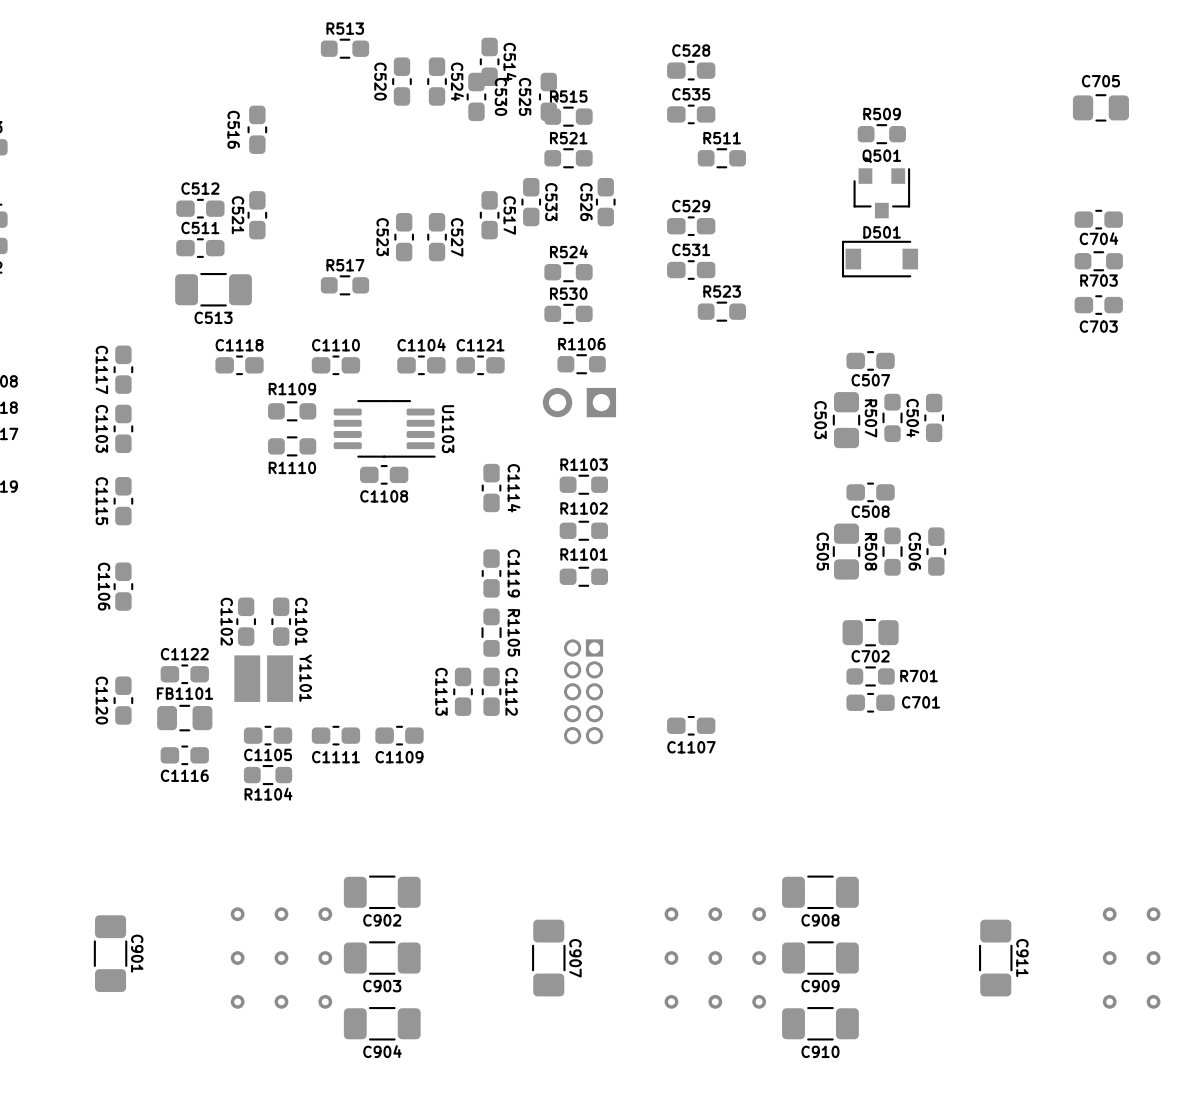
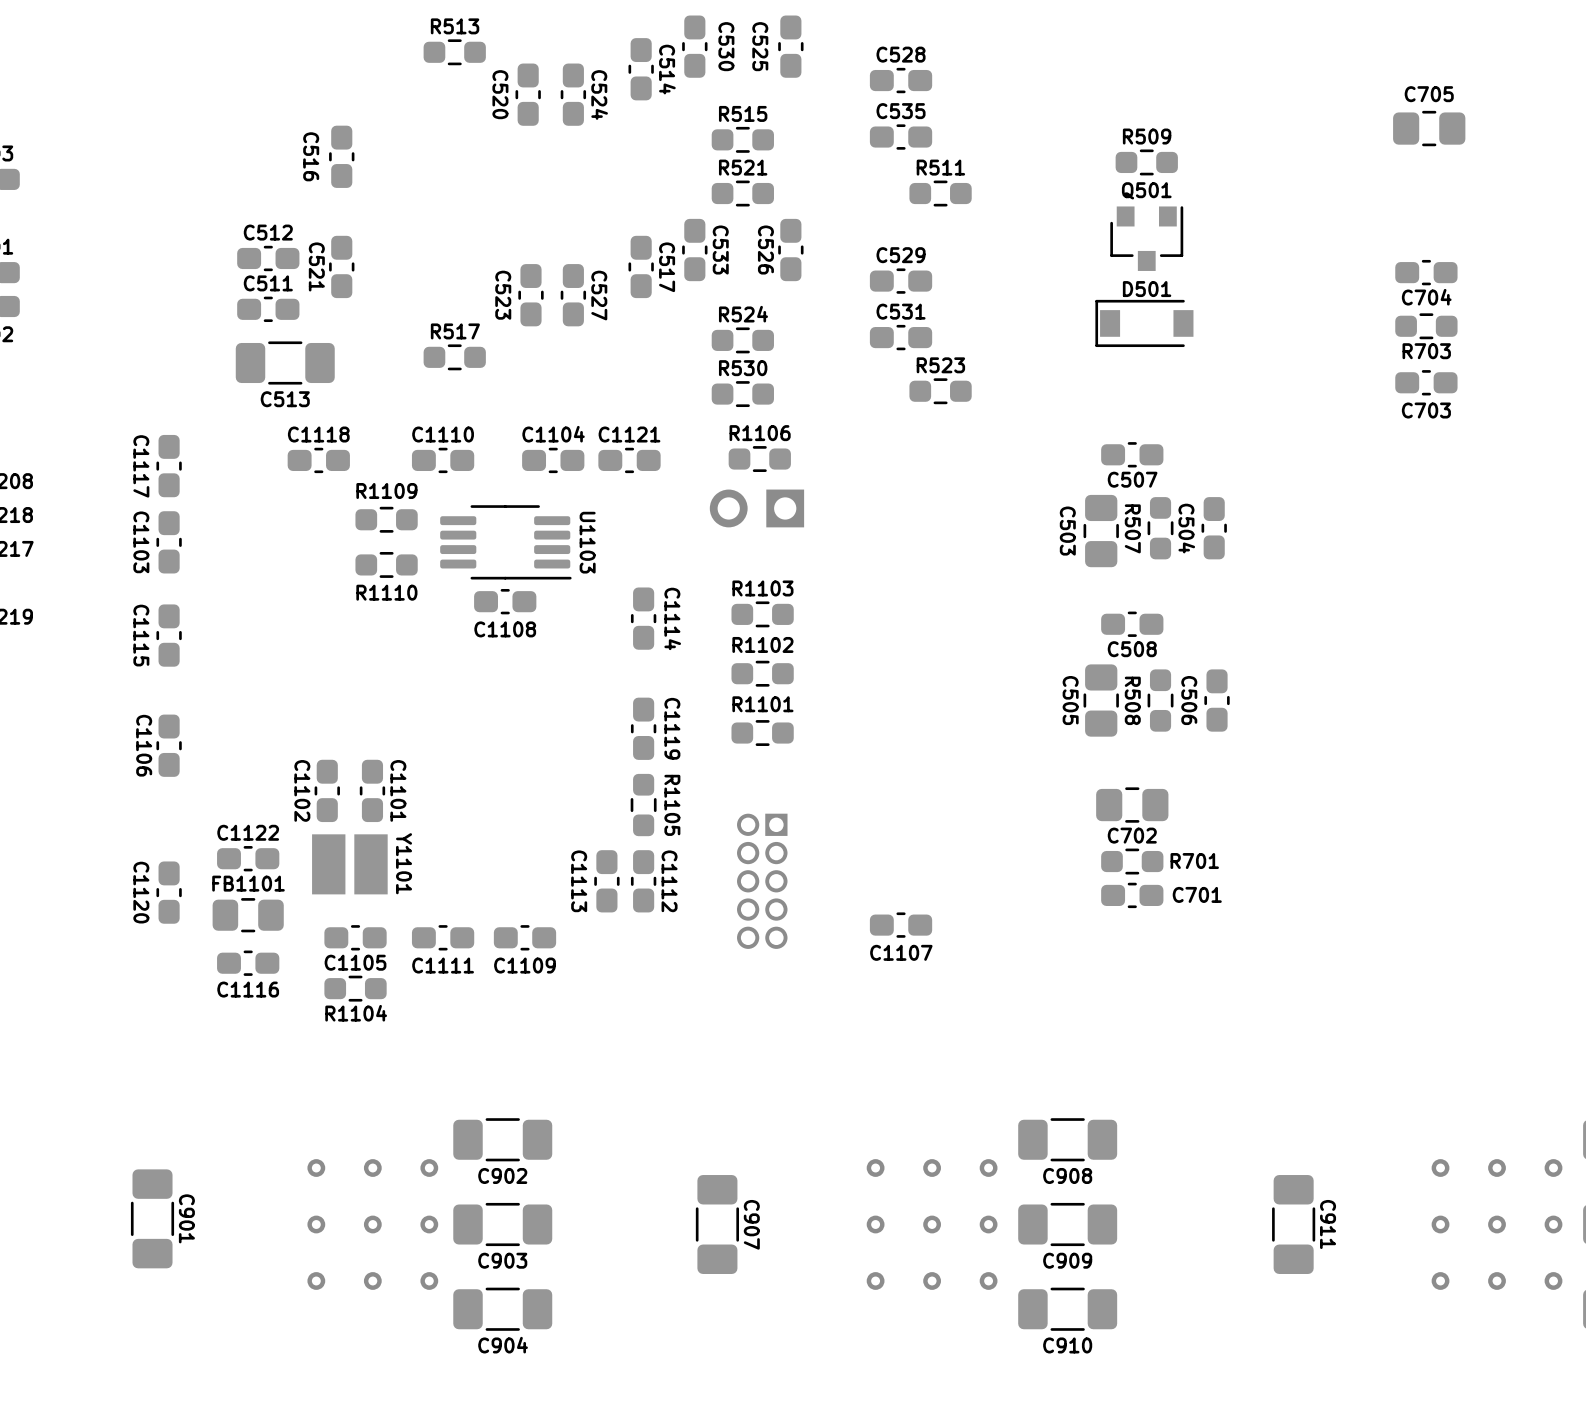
C530 position: (476, 96) -> (694, 46)
C525 position: (548, 96) -> (790, 46)

